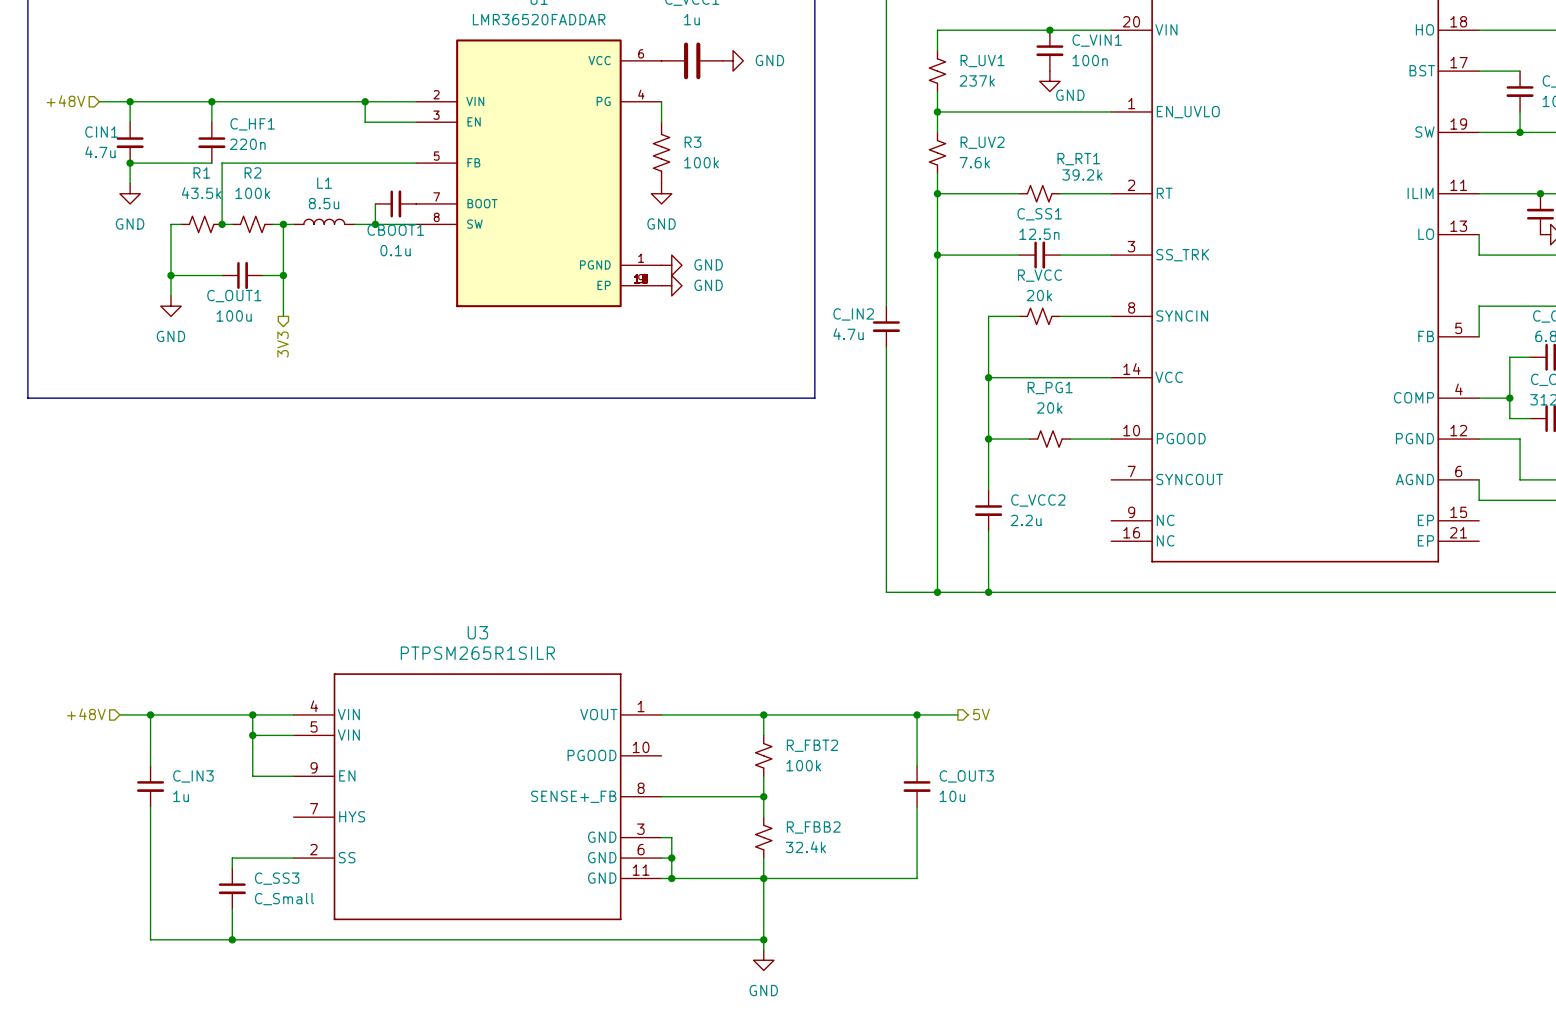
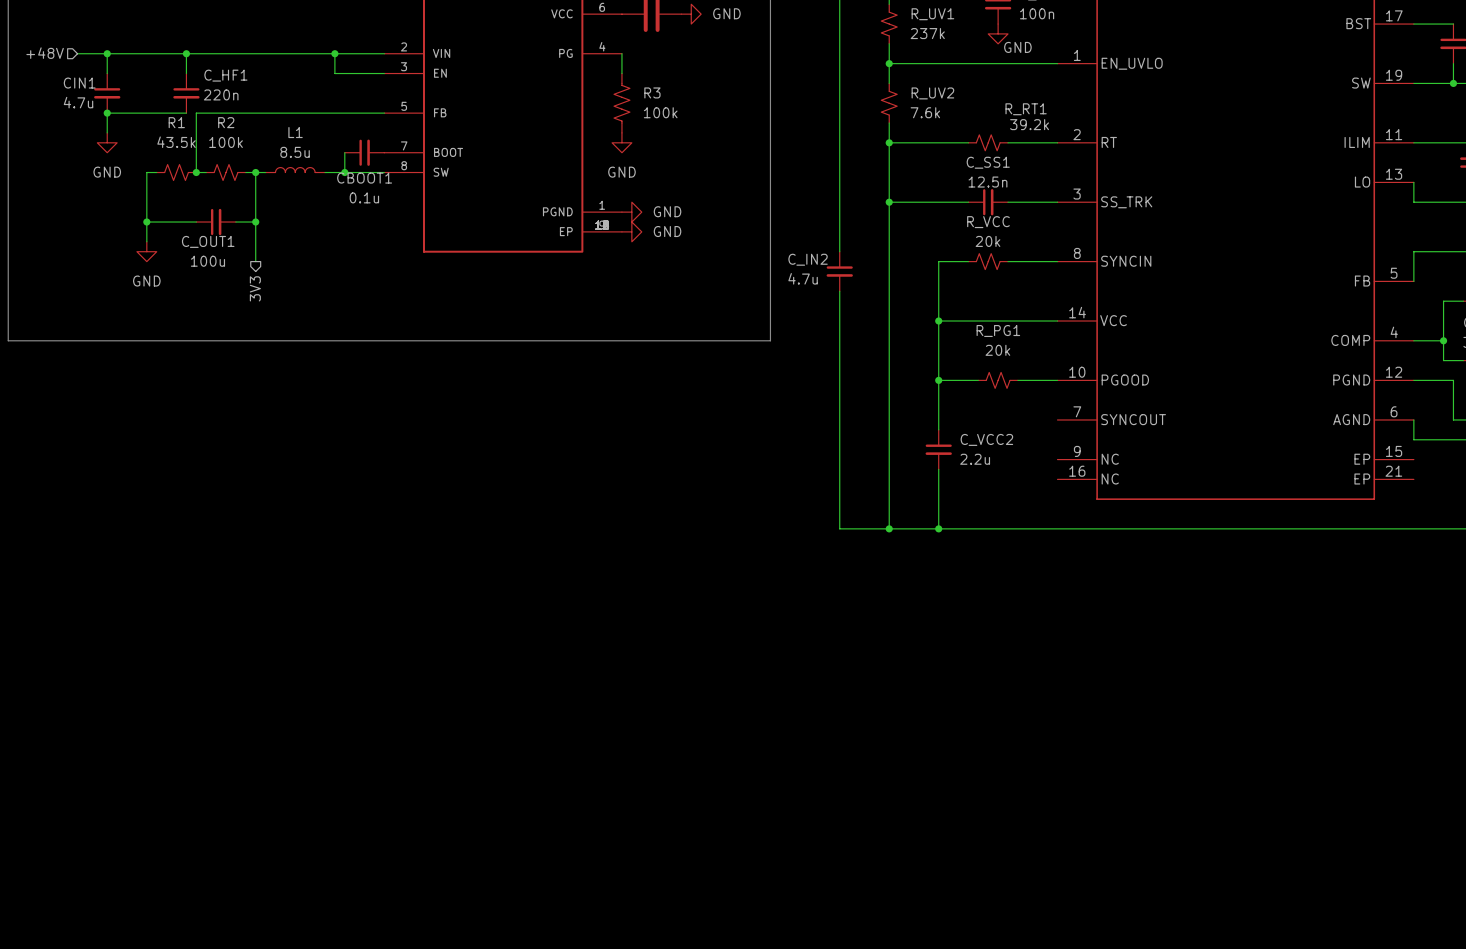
hierarchical label: +48V (86, 714) -> none
wire: (119, 714) (293, 714) -> none
wire: (150, 714) (150, 766) -> none
junction: (150, 714) -> none
wire: (252, 714) (252, 776) (293, 776) -> none
junction: (252, 714) -> none
wire: (661, 714) (957, 714) -> none
wire: (763, 714) (763, 735) -> none
junction: (763, 714) -> none
wire: (917, 714) (917, 766) -> none
junction: (917, 714) -> none
hierarchical label: 5V (981, 714) -> none
wire: (252, 735) (293, 735) -> none
junction: (252, 735) -> none
R_FBT2: 100k (763, 755) -> none
wire: (763, 776) (763, 817) -> none
C_IN3: 1u (150, 786) -> none
C_OUT3: 10u (917, 786) -> none
U3: PTPSM265R1SILR (477, 796) -> none
wire: (661, 796) (763, 796) -> none
junction: (763, 796) -> none
wire: (150, 806) (150, 939) (763, 939) -> none
wire: (917, 806) (917, 878) (661, 878) -> none
wire: (661, 837) (671, 837) (671, 878) -> none
R_FBB2: 32.4k (763, 837) -> none
wire: (293, 858) (232, 858) (232, 868) -> none
wire: (661, 858) (671, 858) -> none
junction: (671, 858) -> none
wire: (763, 858) (763, 950) -> none
junction: (671, 878) -> none
junction: (763, 878) -> none
C_SS3: C_Small (232, 888) -> none
wire: (232, 909) (232, 939) -> none
junction: (232, 939) -> none
junction: (763, 939) -> none
power symbol: GND (763, 960) -> none

